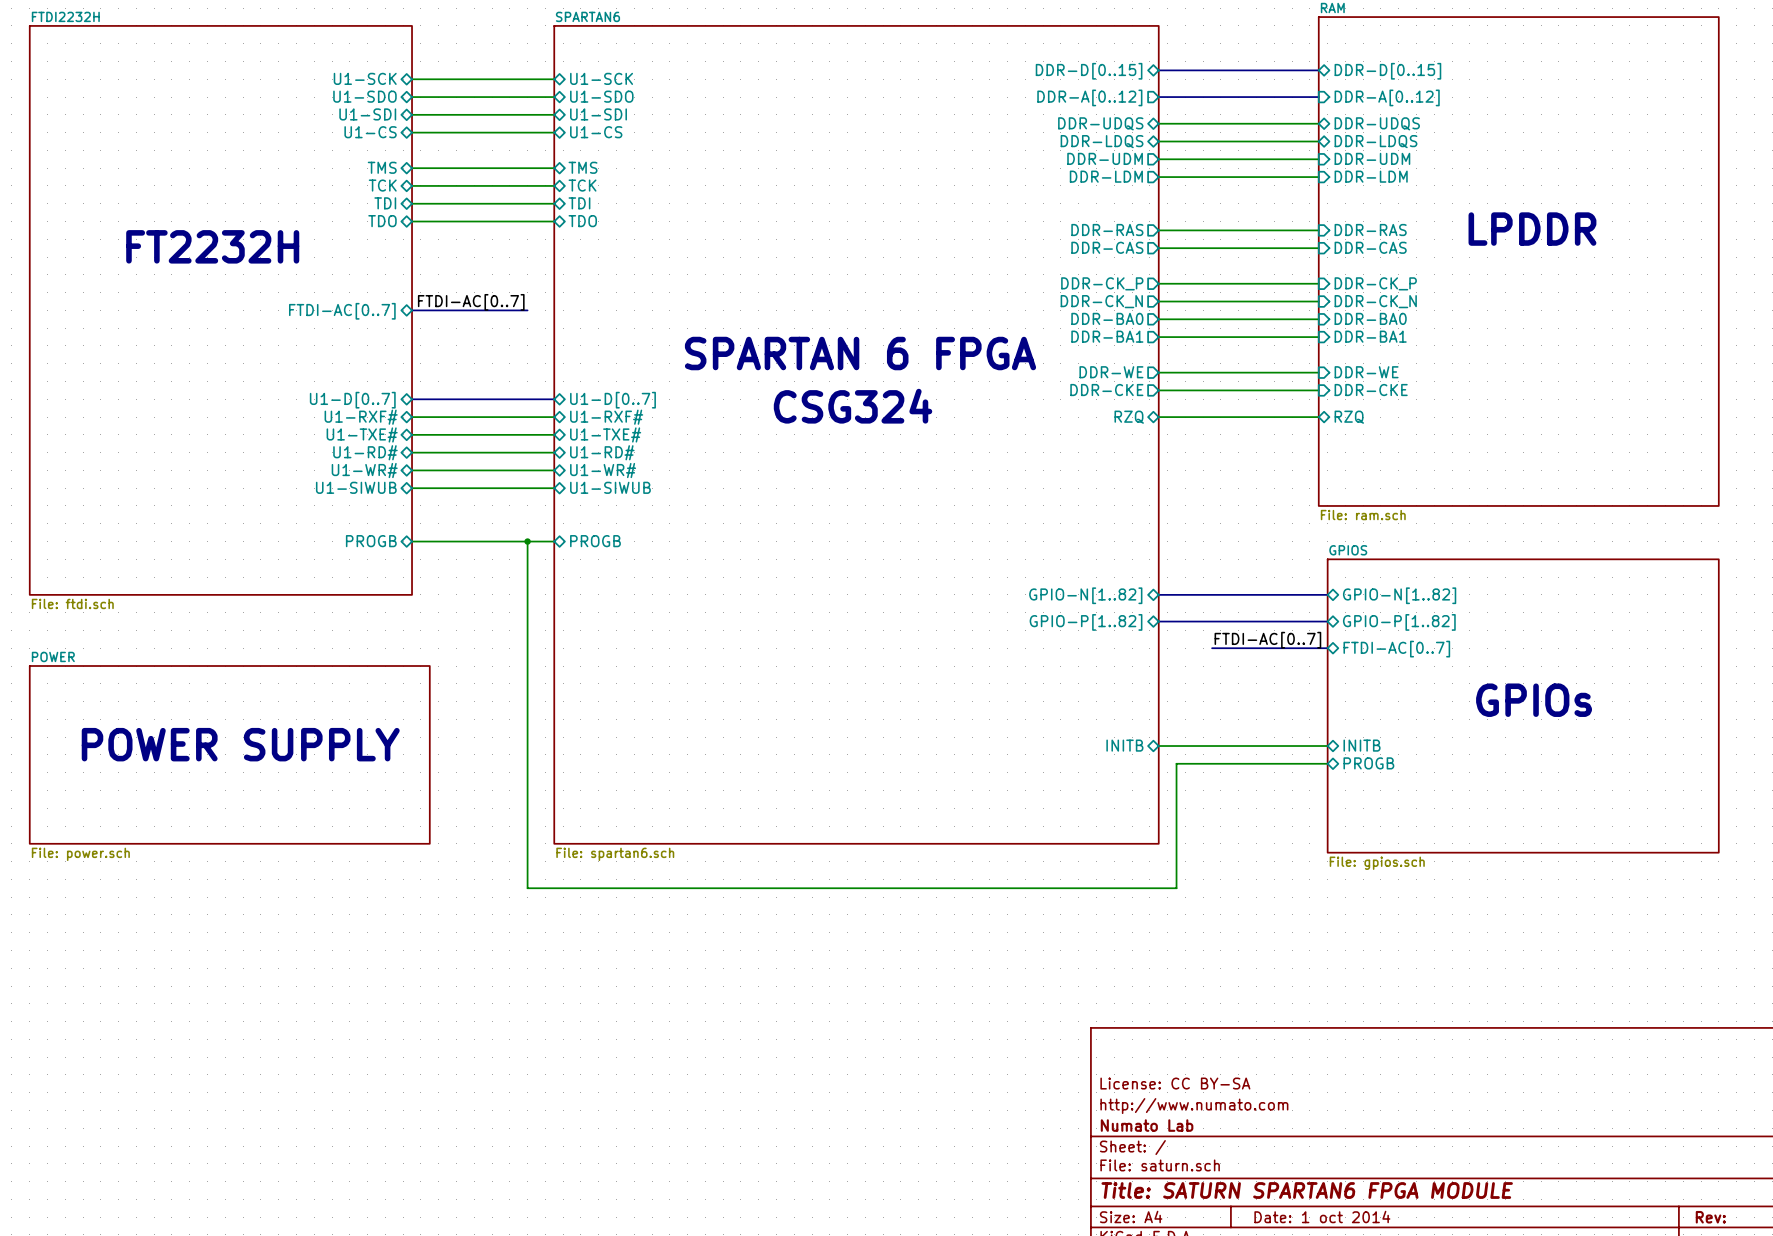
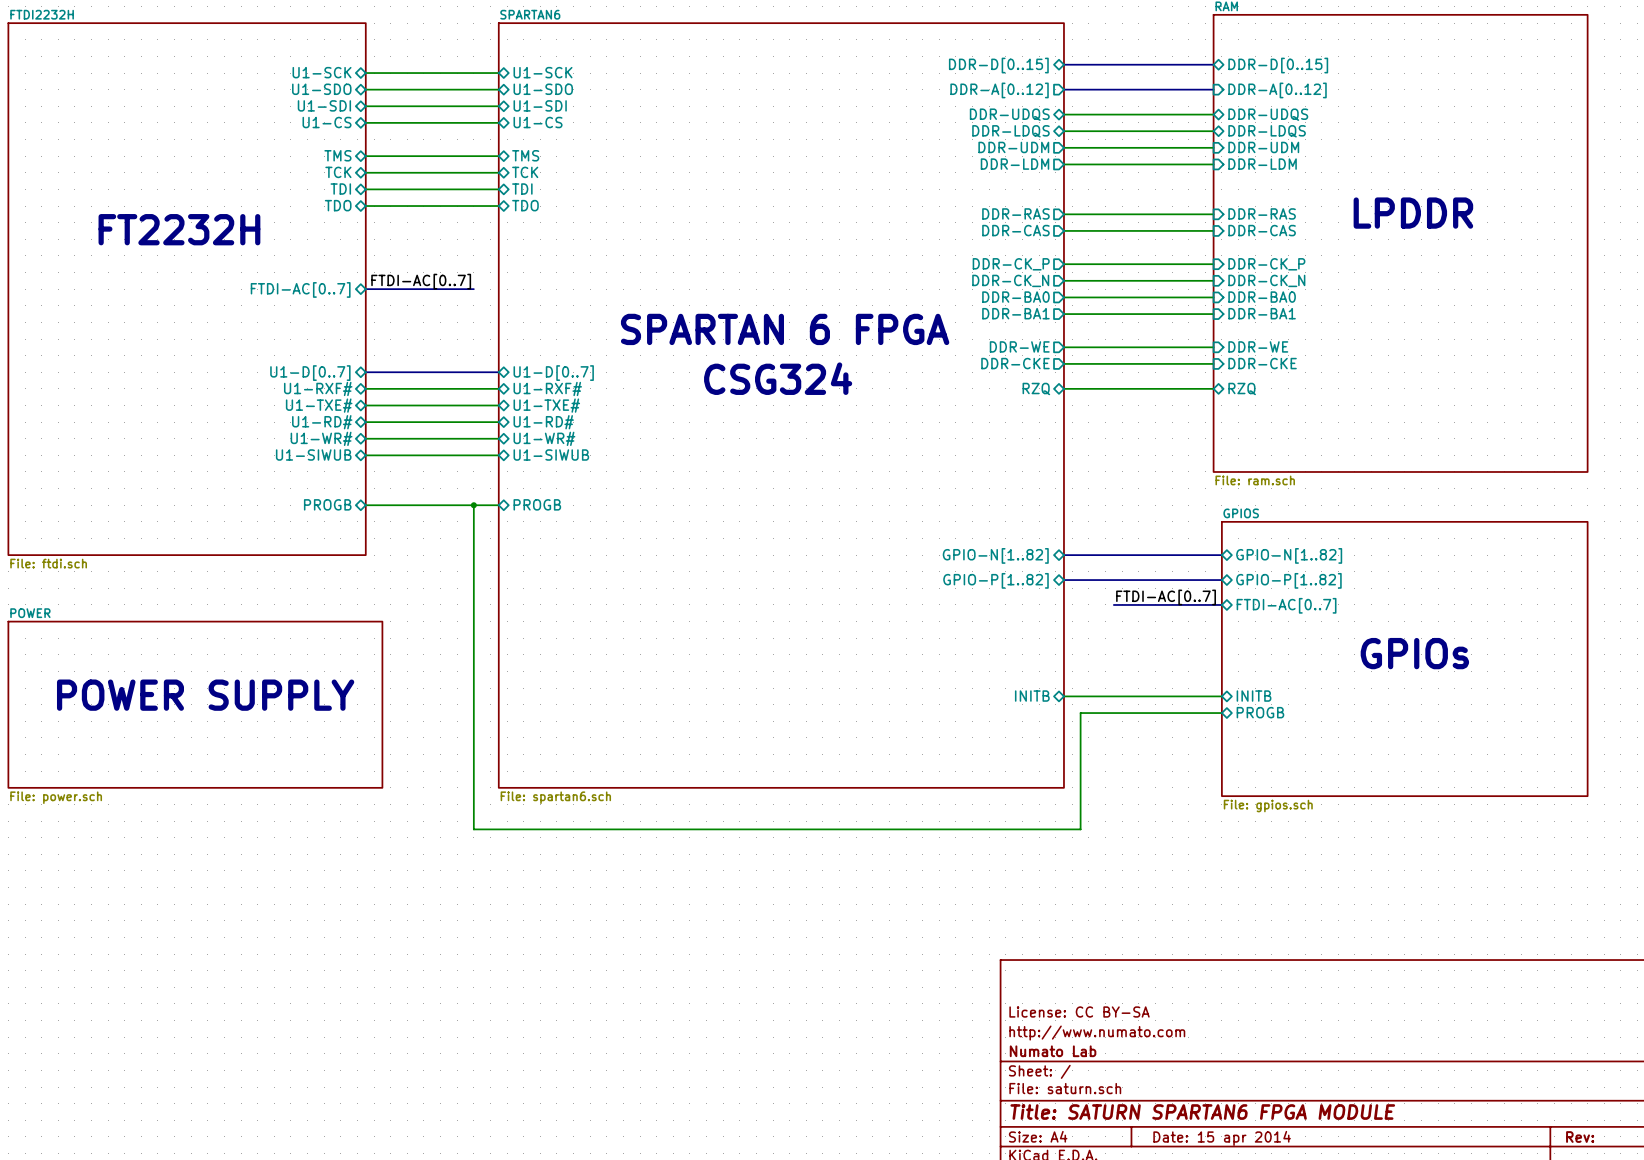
title block: Date: 1 oct 2014 (1322, 1216) -> Date: 15 apr 2014 (1222, 1138)

